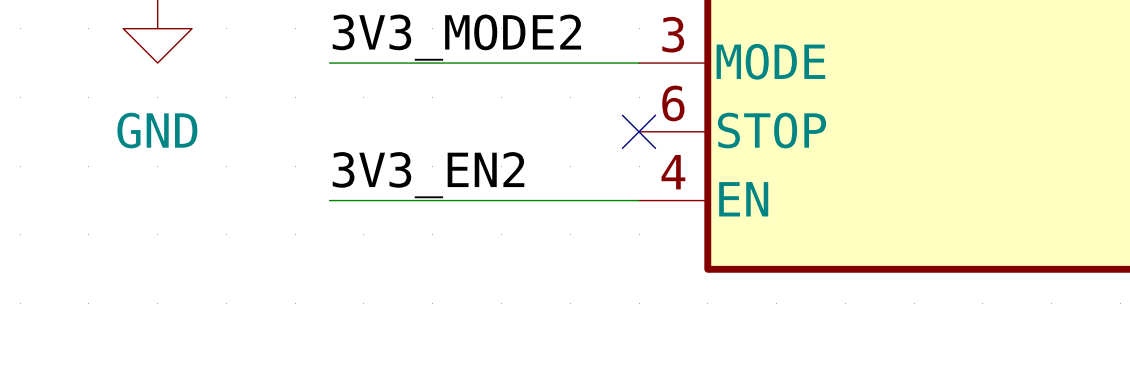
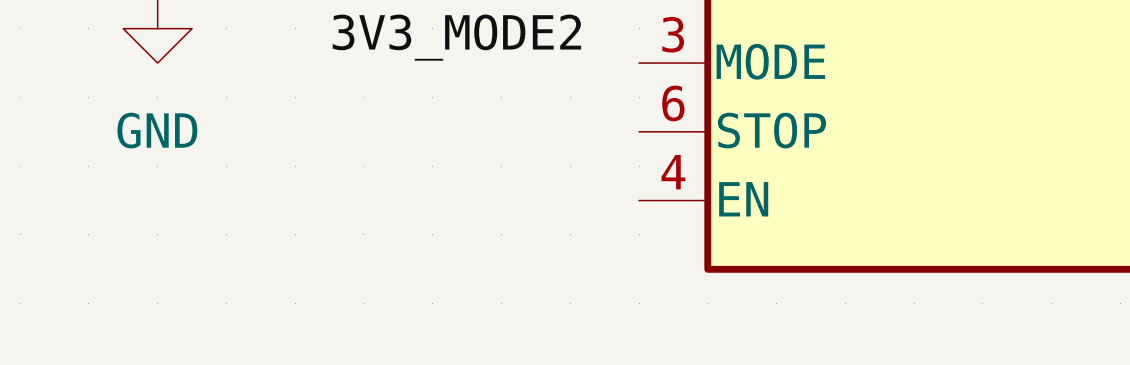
wire: (329, 63) (639, 63) -> none
no-connect mark: (639, 131) -> none
label: 3V3_EN2 (428, 175) -> none
wire: (329, 200) (639, 200) -> none

